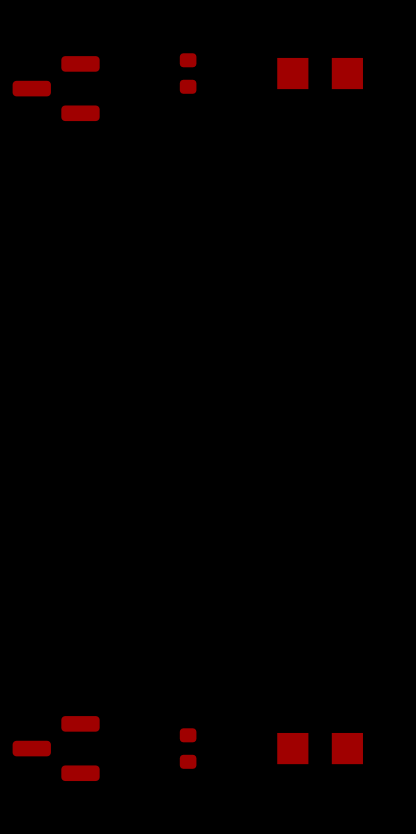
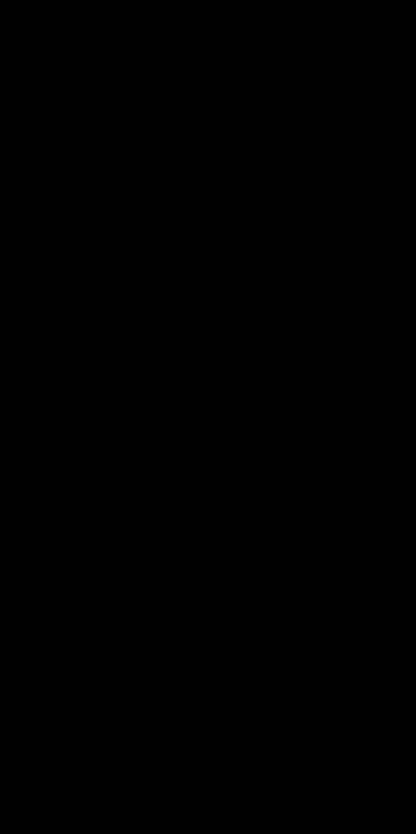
part: (188, 73) -> none
part: (320, 73) -> none
part: (56, 88) -> none
part: (56, 748) -> none
part: (188, 748) -> none
part: (320, 748) -> none

